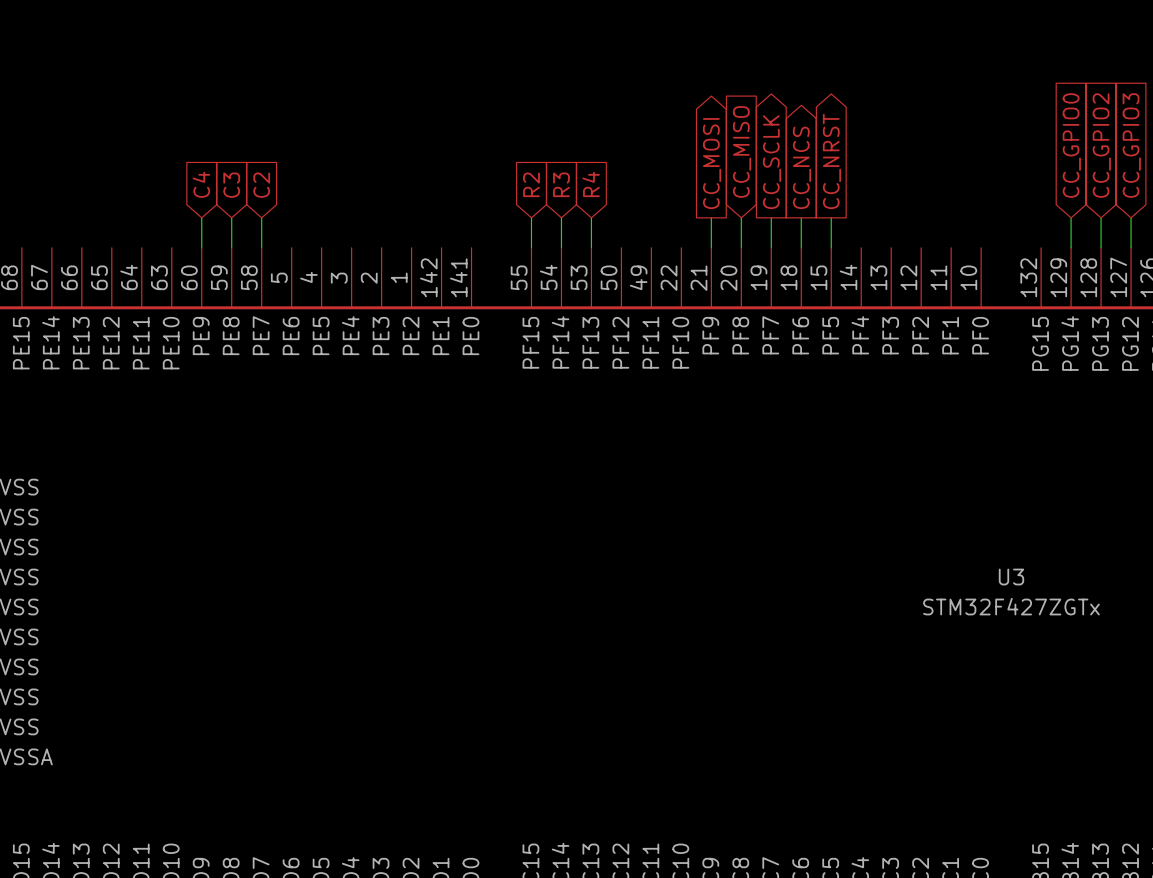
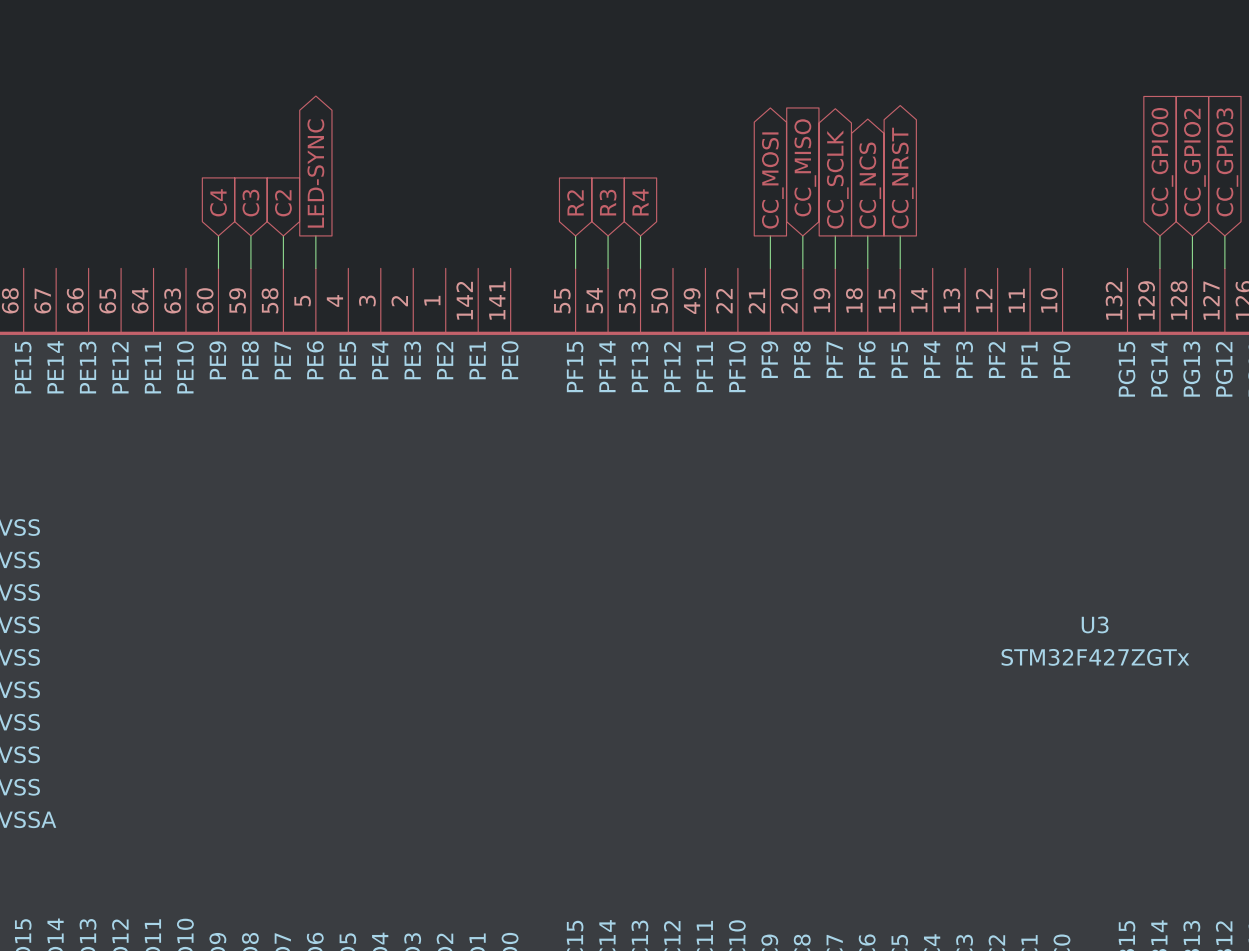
global label: none -> LED-SYNC (315, 173)
wire: none -> (315, 235) (315, 268)

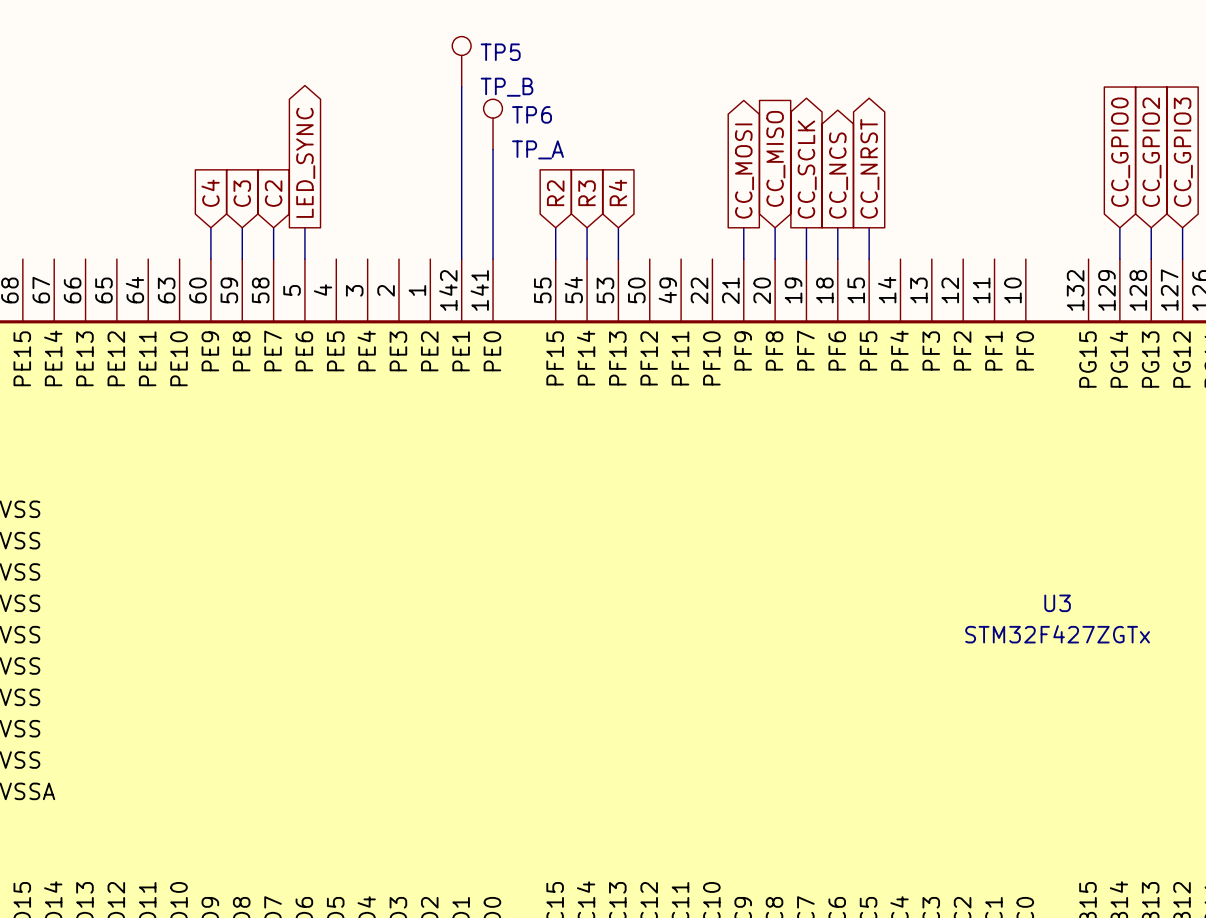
TP5: none -> TP_B (461, 61)
wire: none -> (461, 86) (461, 259)
TP6: none -> TP_A (493, 124)
wire: none -> (493, 149) (493, 259)
global label: LED-SYNC (315, 173) -> LED_SYNC (305, 162)

